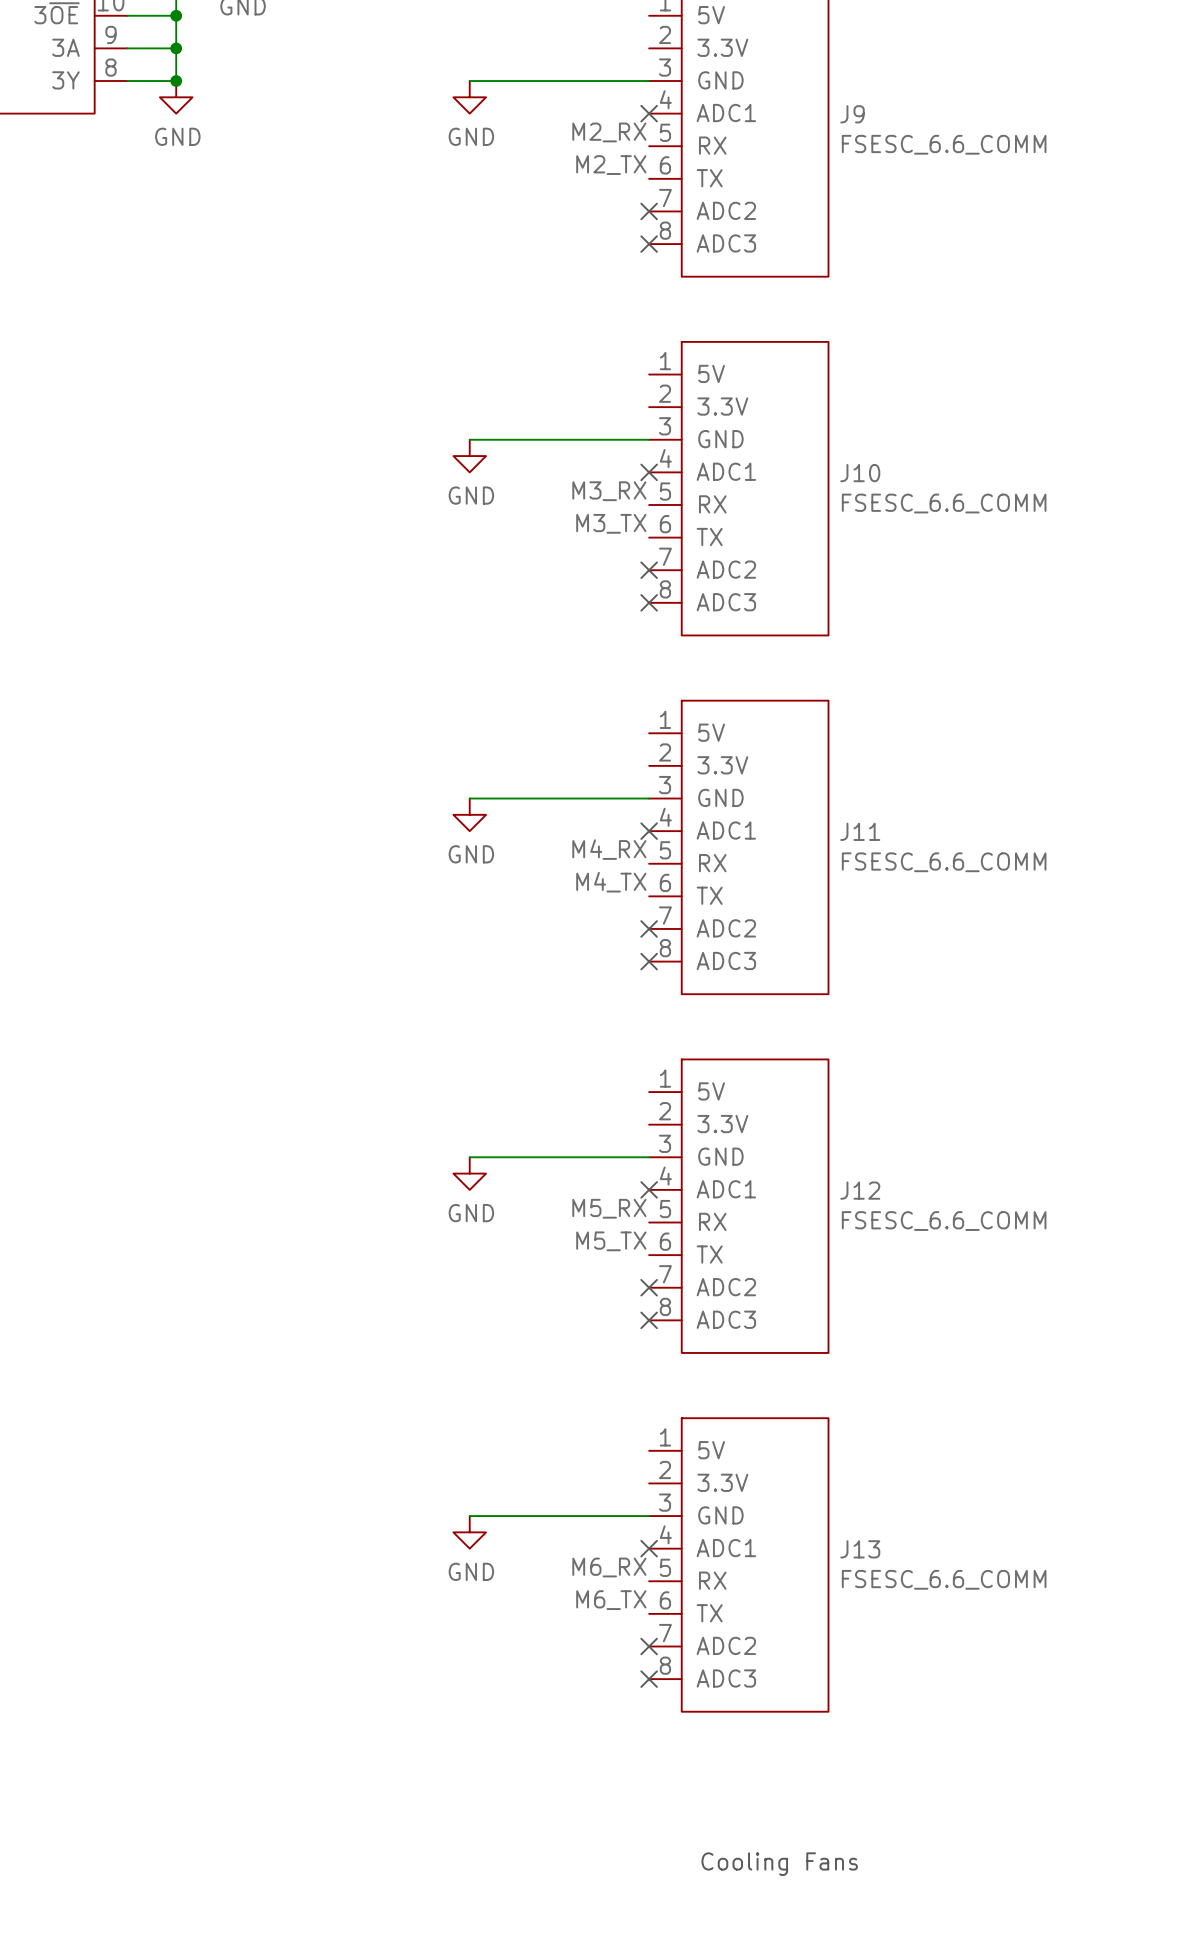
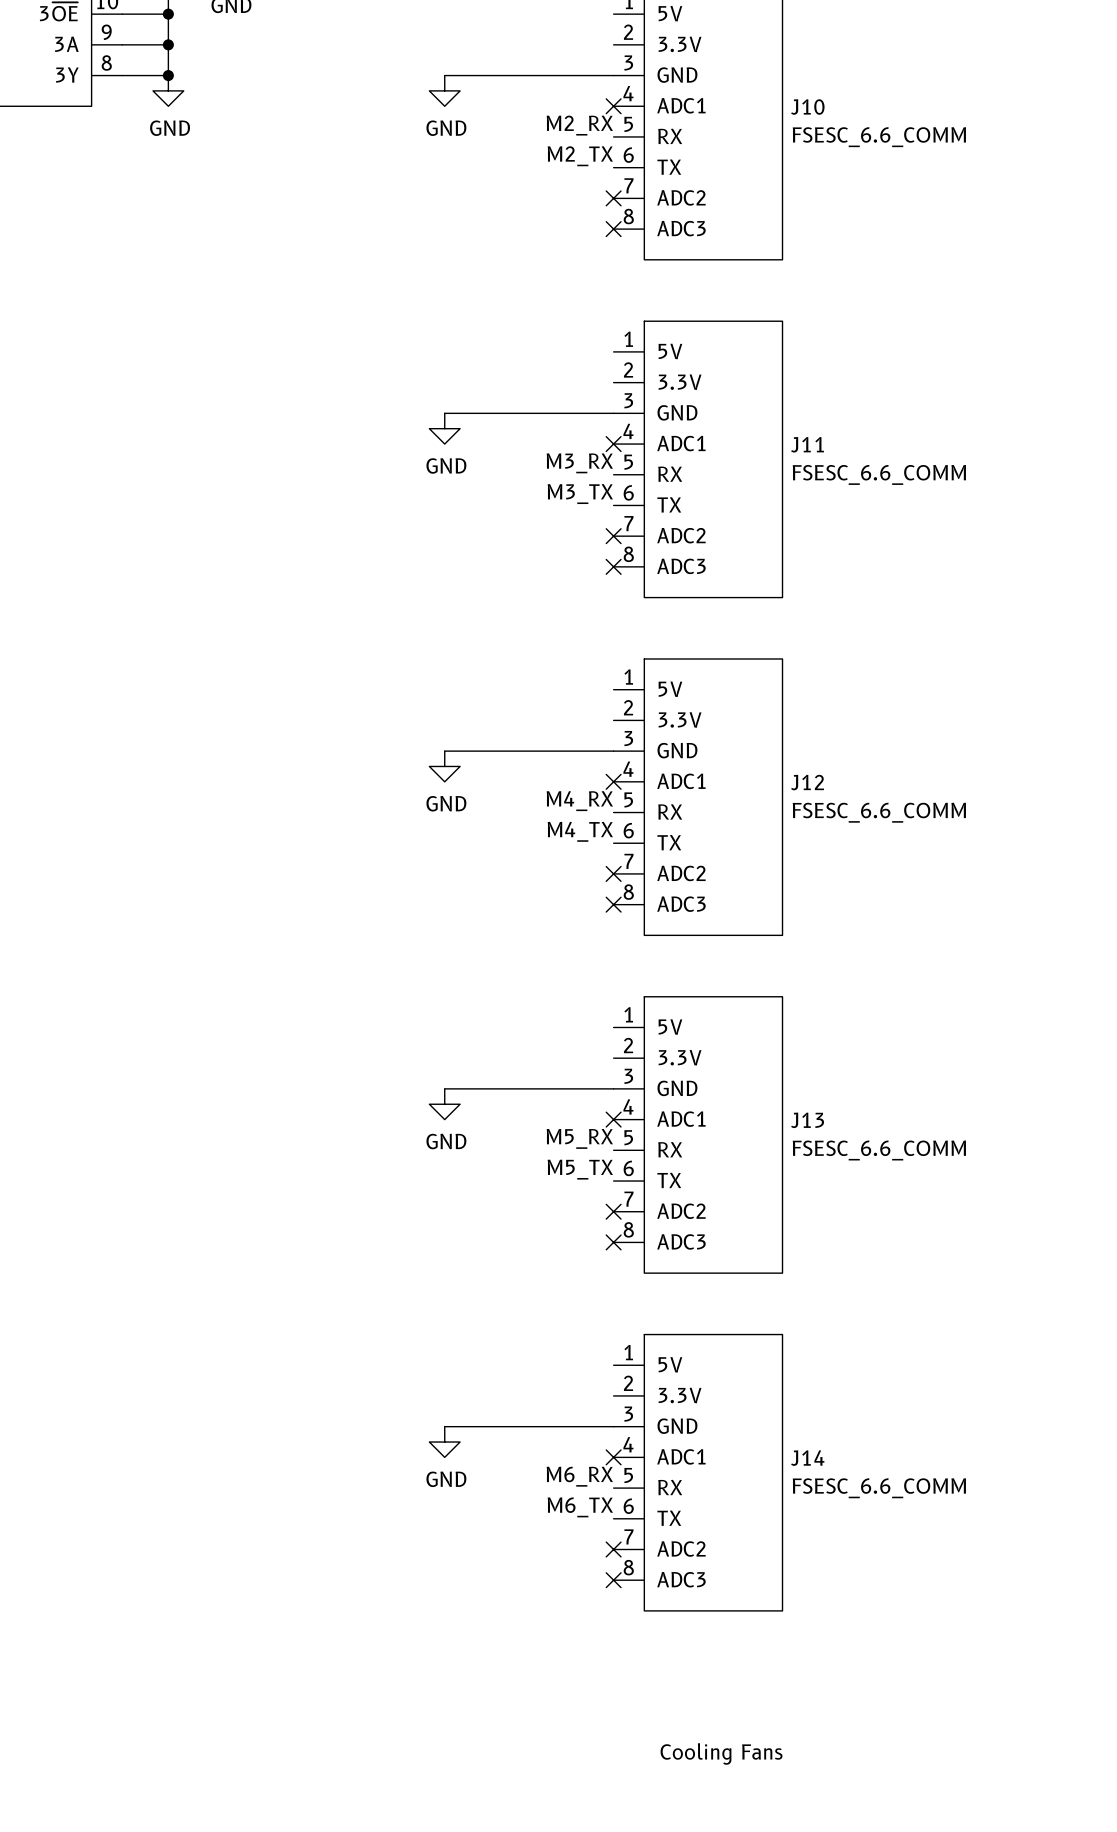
J9 name: J9 (852, 114) -> J10 (807, 107)
J10 name: J10 (860, 473) -> J11 (807, 444)
J11 name: J11 (860, 831) -> J12 (807, 782)
J12 name: J12 (860, 1190) -> J13 (807, 1120)
J13 name: J13 (860, 1549) -> J14 (807, 1458)

